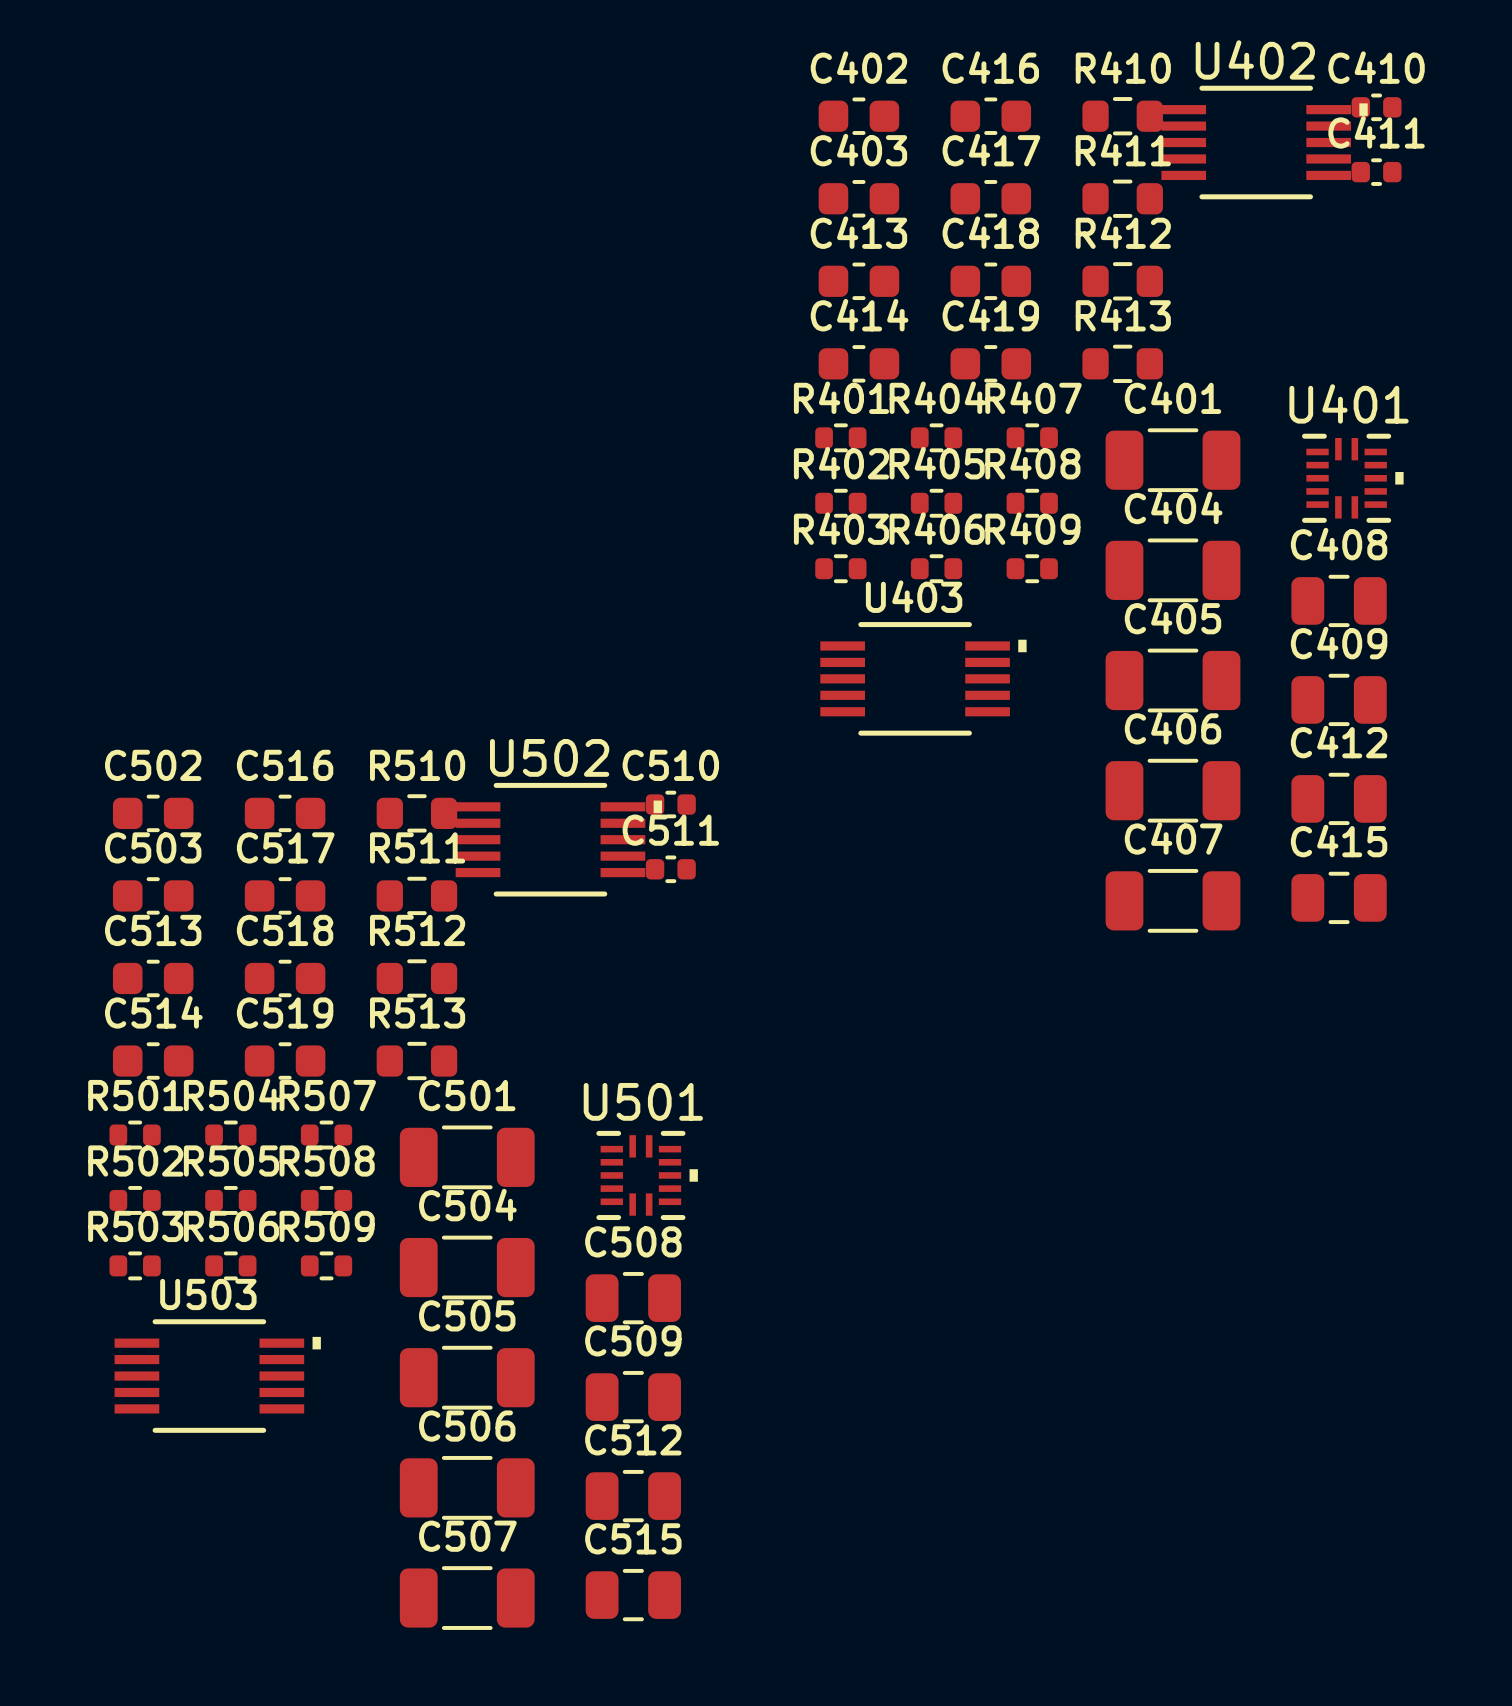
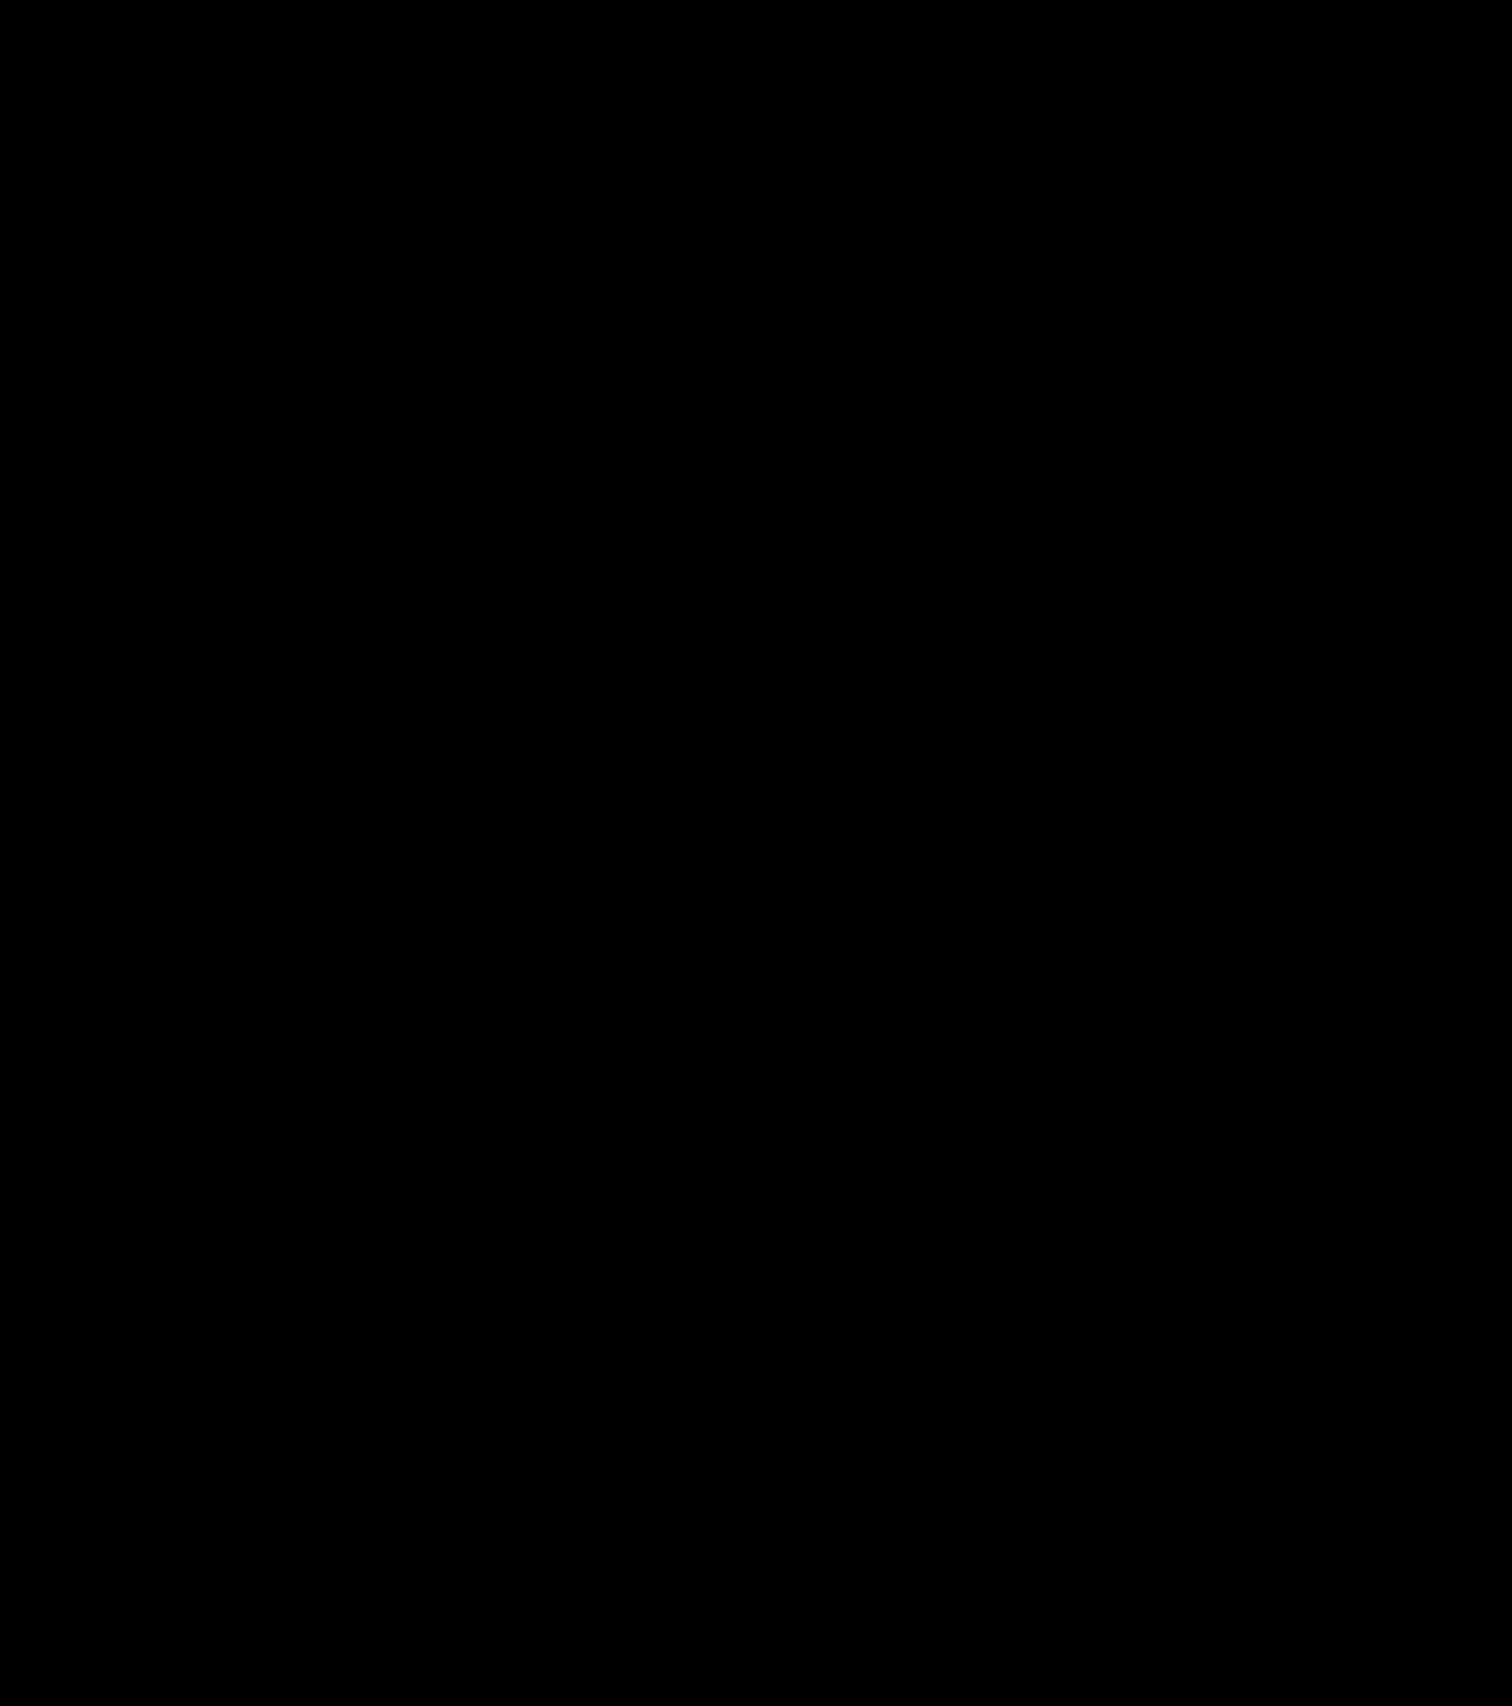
C410: (1376, 107) -> none
C402: (858, 116) -> none
C416: (990, 116) -> none
R410: (1122, 116) -> none
U402: (1264, 142) -> none
C411: (1376, 172) -> none
C403: (858, 198) -> none
C417: (990, 198) -> none
R411: (1122, 198) -> none
C413: (858, 281) -> none
C418: (990, 281) -> none
R412: (1122, 281) -> none
C414: (858, 363) -> none
C419: (990, 363) -> none
R413: (1122, 363) -> none
R401: (840, 437) -> none
R404: (936, 437) -> none
R407: (1032, 437) -> none
C401: (1172, 460) -> none
U401: (1352, 478) -> none
R402: (840, 503) -> none
R405: (936, 503) -> none
R408: (1032, 503) -> none
R403: (840, 568) -> none
R406: (936, 568) -> none
R409: (1032, 568) -> none
C404: (1172, 570) -> none
C408: (1339, 600) -> none
U403: (923, 678) -> none
C405: (1172, 680) -> none
C409: (1339, 699) -> none
C406: (1172, 790) -> none
C412: (1339, 798) -> none
C510: (670, 804) -> none
C502: (153, 813) -> none
C516: (285, 813) -> none
R510: (416, 813) -> none
U502: (558, 839) -> none
C511: (670, 869) -> none
C503: (153, 895) -> none
C517: (285, 895) -> none
R511: (416, 895) -> none
C415: (1339, 897) -> none
C407: (1172, 900) -> none
C513: (153, 978) -> none
C518: (285, 978) -> none
R512: (416, 978) -> none
C514: (153, 1061) -> none
C519: (285, 1061) -> none
R513: (416, 1061) -> none
R501: (135, 1135) -> none
R504: (230, 1135) -> none
R507: (326, 1135) -> none
C501: (467, 1157) -> none
U501: (647, 1175) -> none
R502: (135, 1200) -> none
R505: (230, 1200) -> none
R508: (326, 1200) -> none
R503: (135, 1265) -> none
R506: (230, 1265) -> none
R509: (326, 1265) -> none
C504: (467, 1267) -> none
C508: (633, 1298) -> none
U503: (217, 1376) -> none
C505: (467, 1377) -> none
C509: (633, 1397) -> none
C506: (467, 1487) -> none
C512: (633, 1496) -> none
C515: (633, 1595) -> none
C507: (467, 1598) -> none

